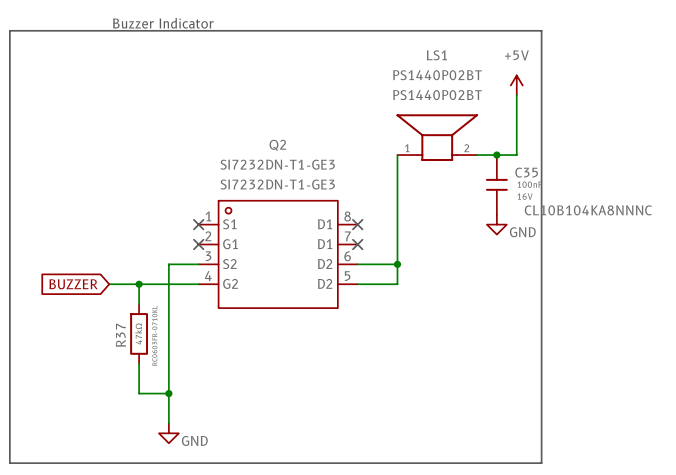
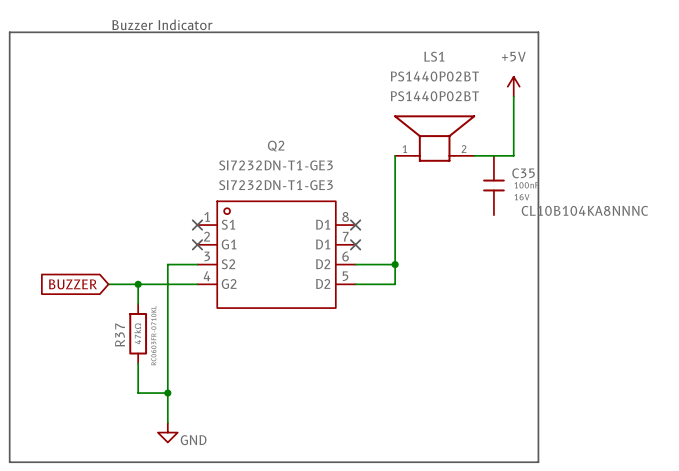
junction: (496, 155) -> none
power symbol: GND (496, 224) -> none

